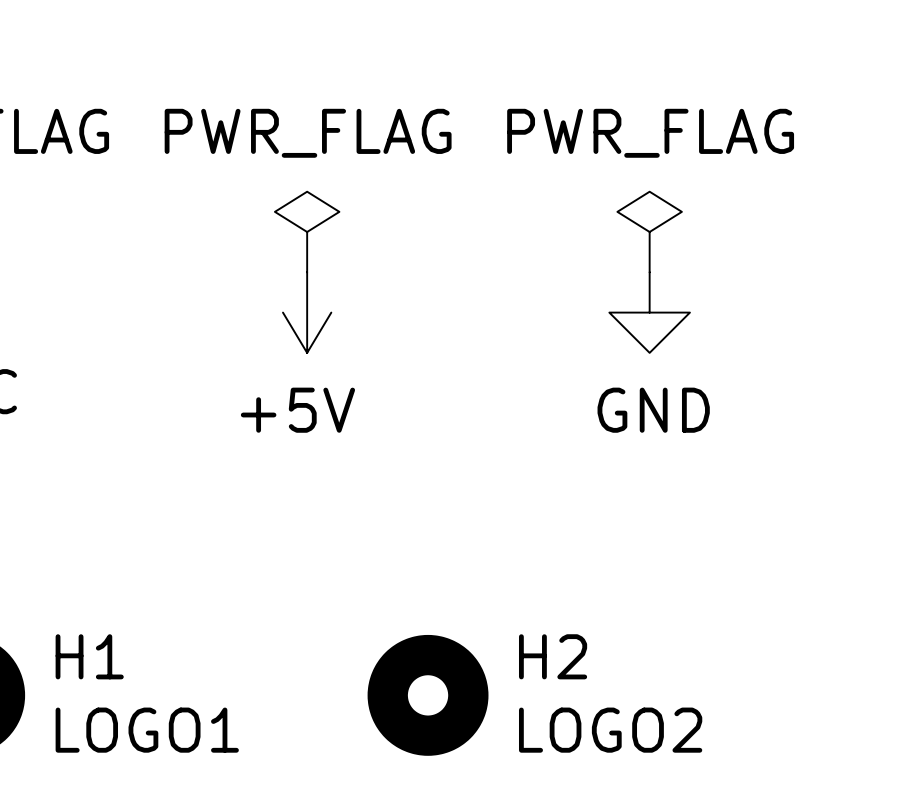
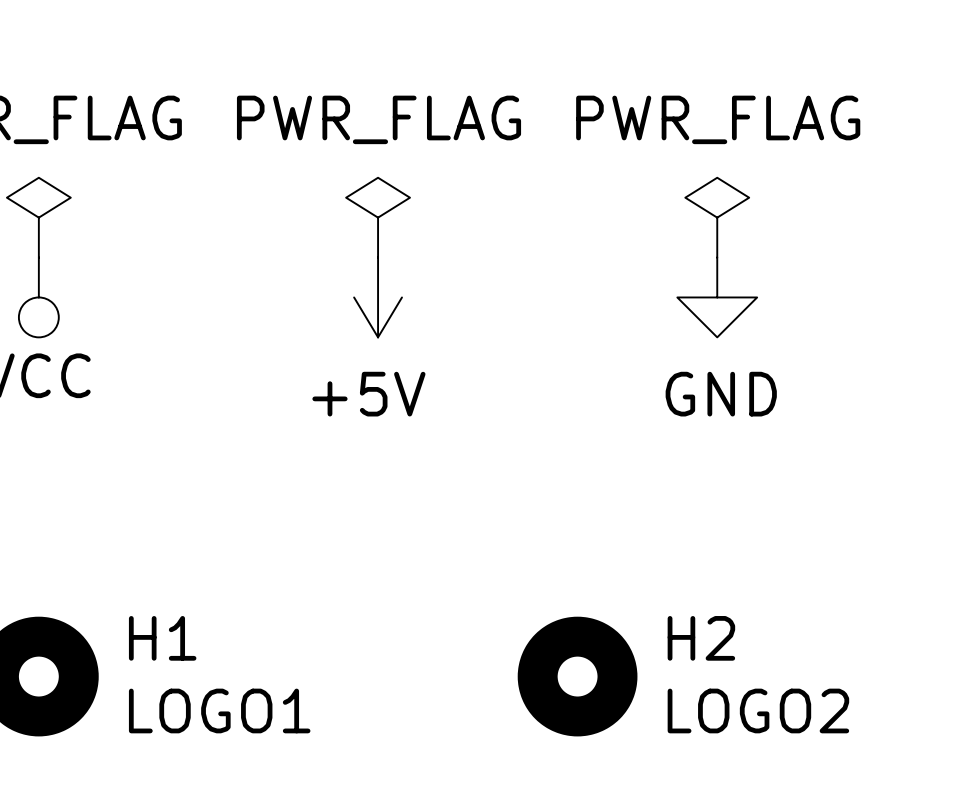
H2 position: (428, 695) -> (577, 676)

